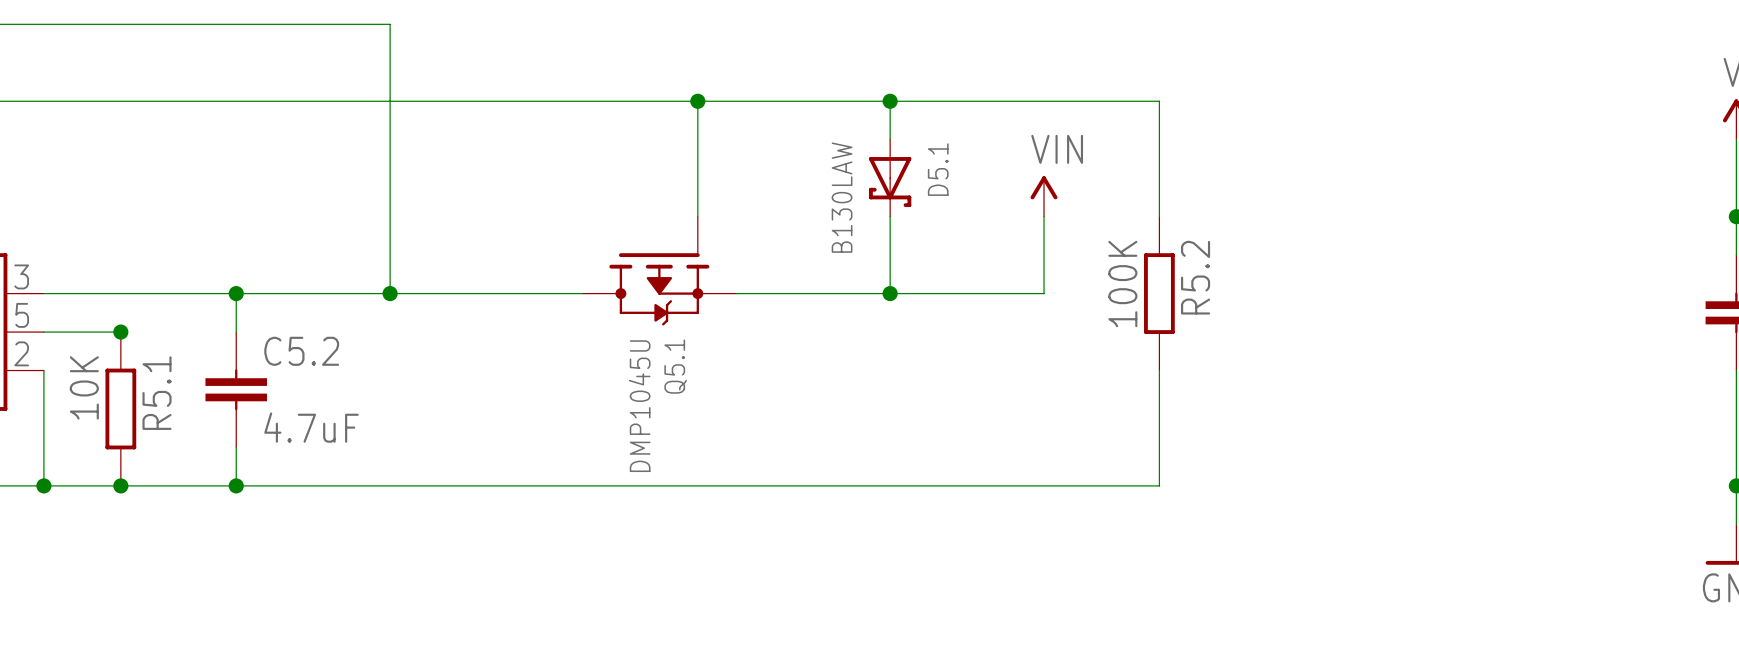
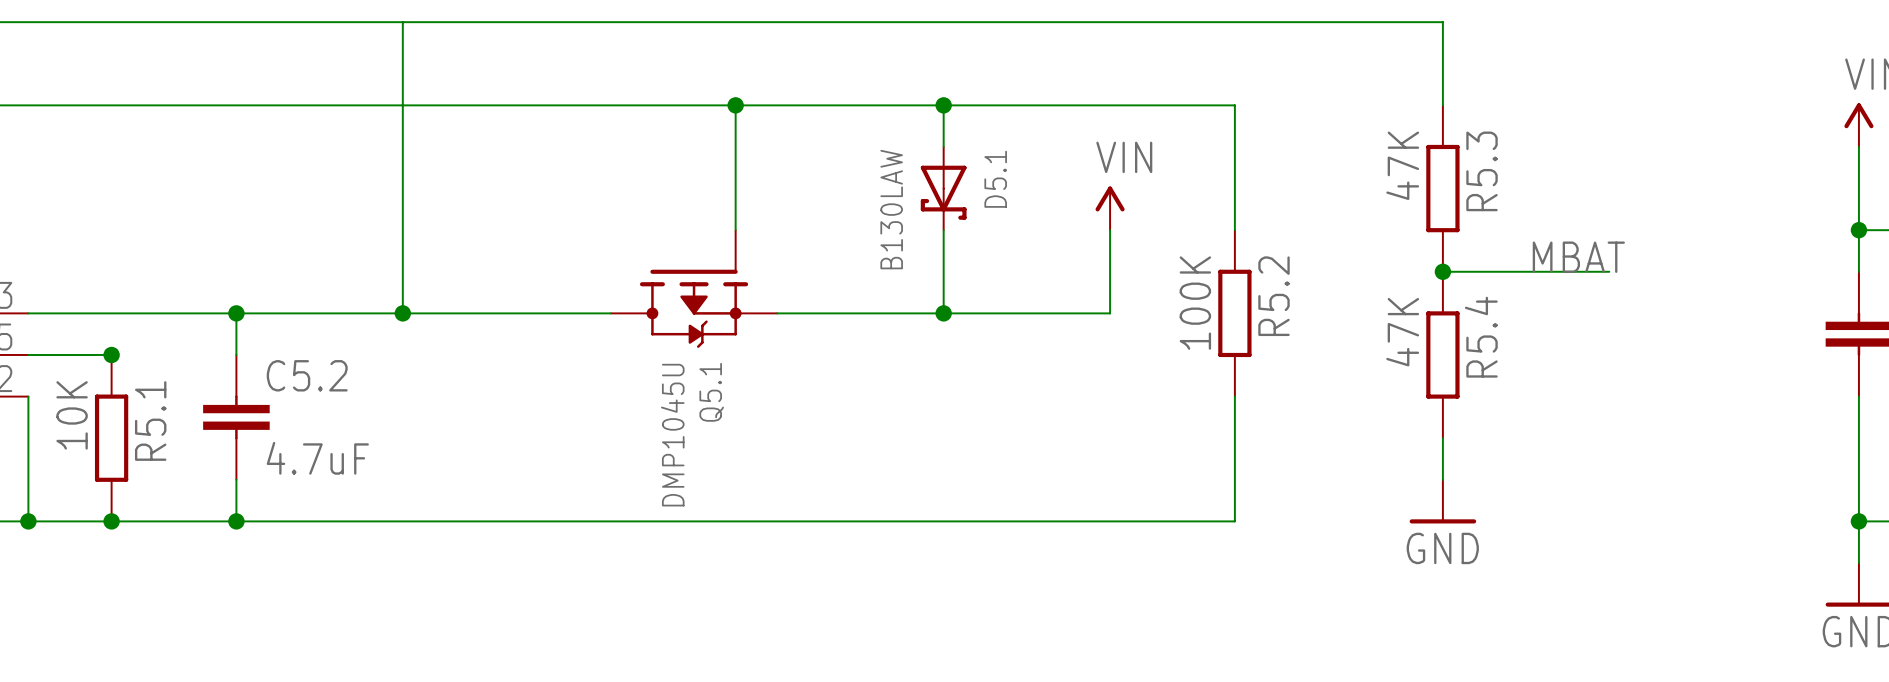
wire: none -> (402, 22) (1442, 22) (1442, 105)
R5.3: none -> 47K (1442, 188)
label: none -> MBAT (1578, 257)
wire: none -> (1442, 271) (1609, 271)
junction: none -> (1442, 271)
R5.4: none -> 47K (1442, 354)
wire: none -> (1442, 438) (1442, 479)
power symbol: none -> GND (1442, 501)

